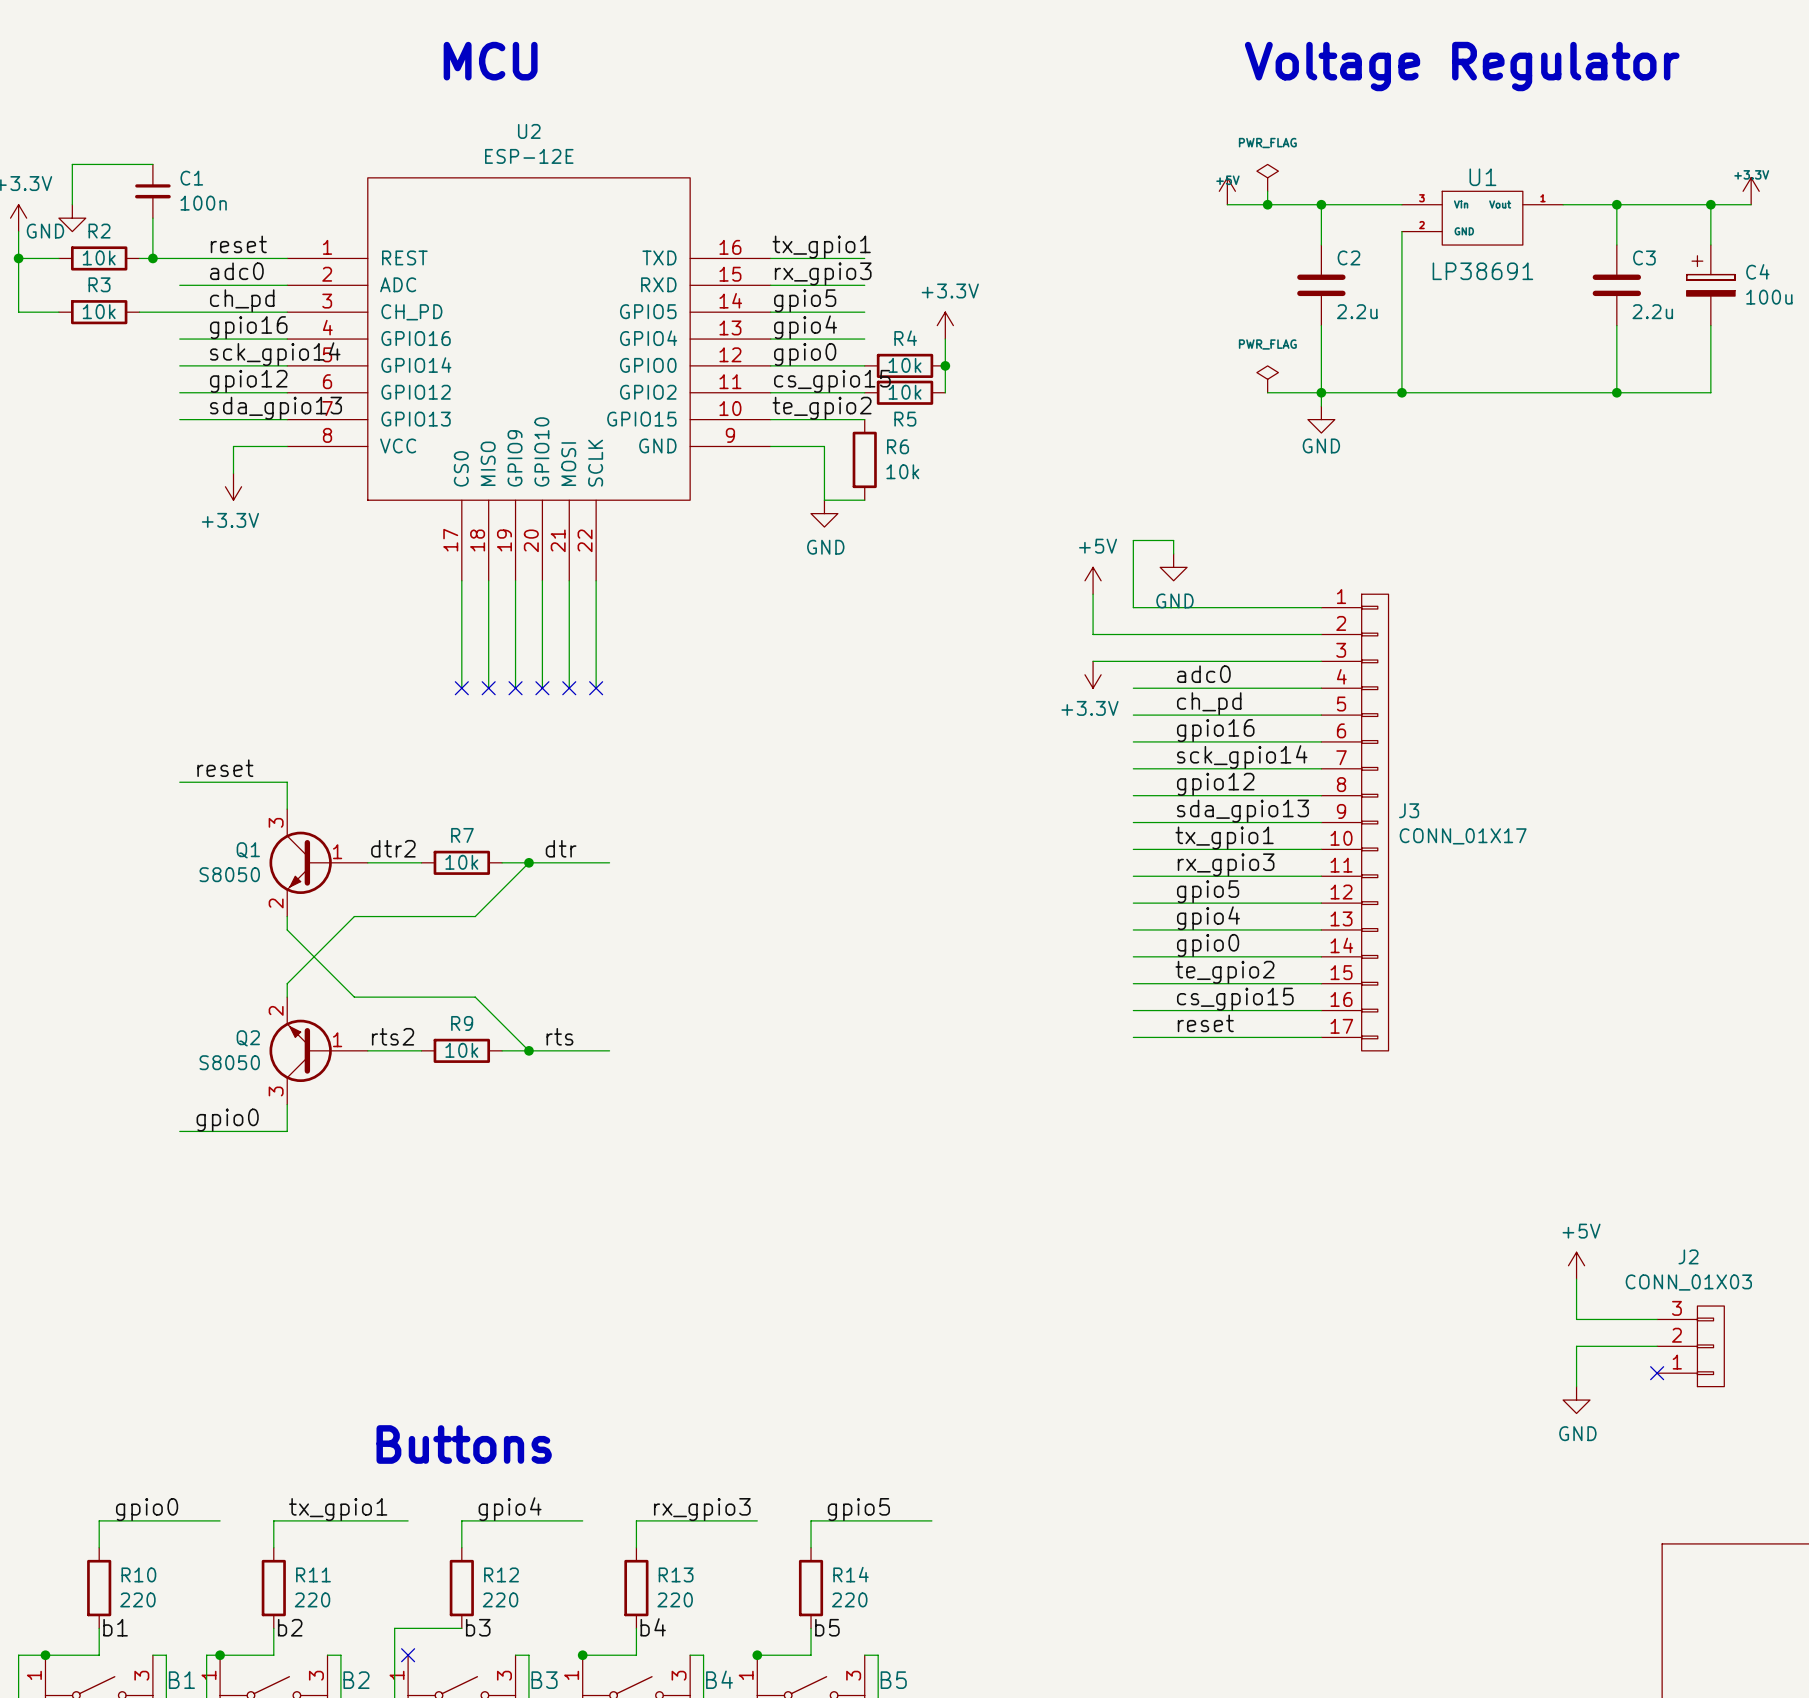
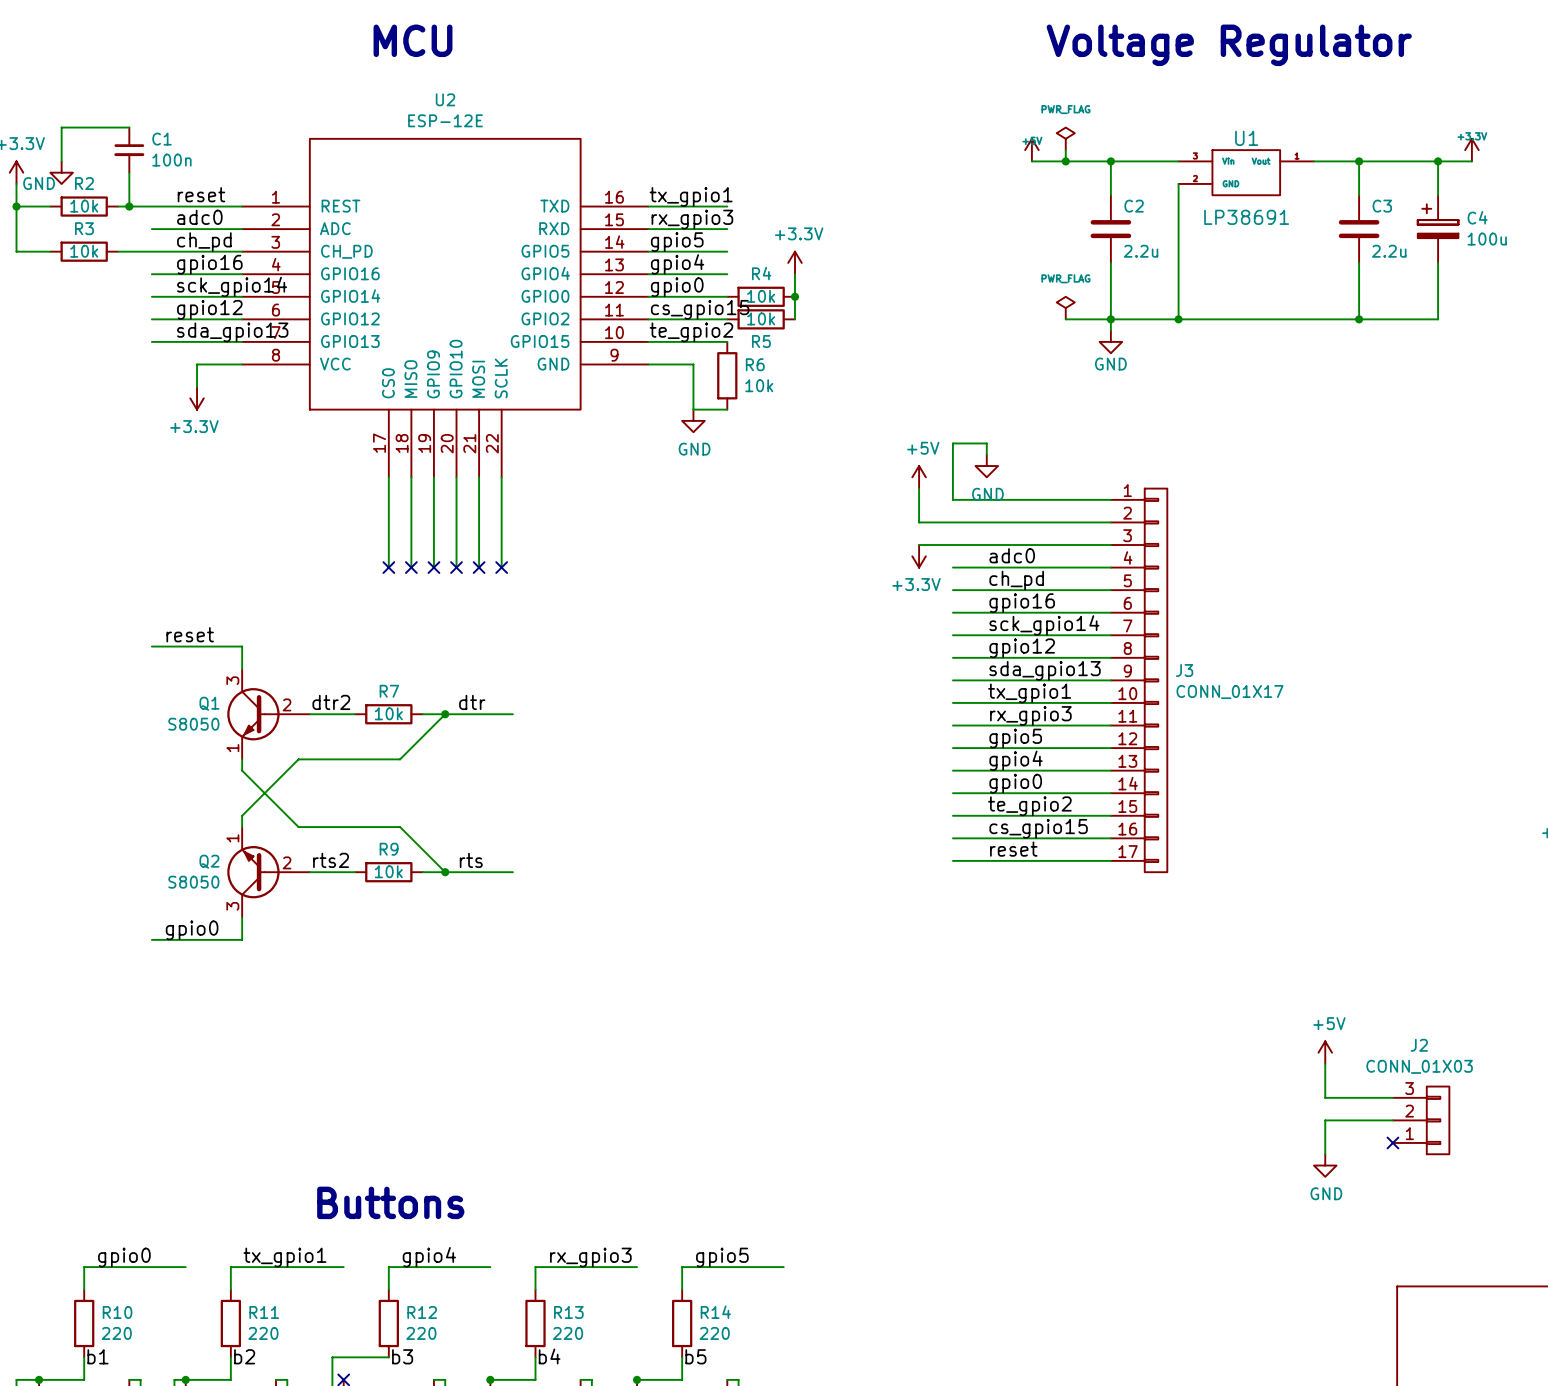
Q1 symbol: [269, 809, 368, 917] -> [227, 669, 310, 760]
Q2 symbol: [269, 997, 368, 1105] -> [227, 827, 310, 918]

